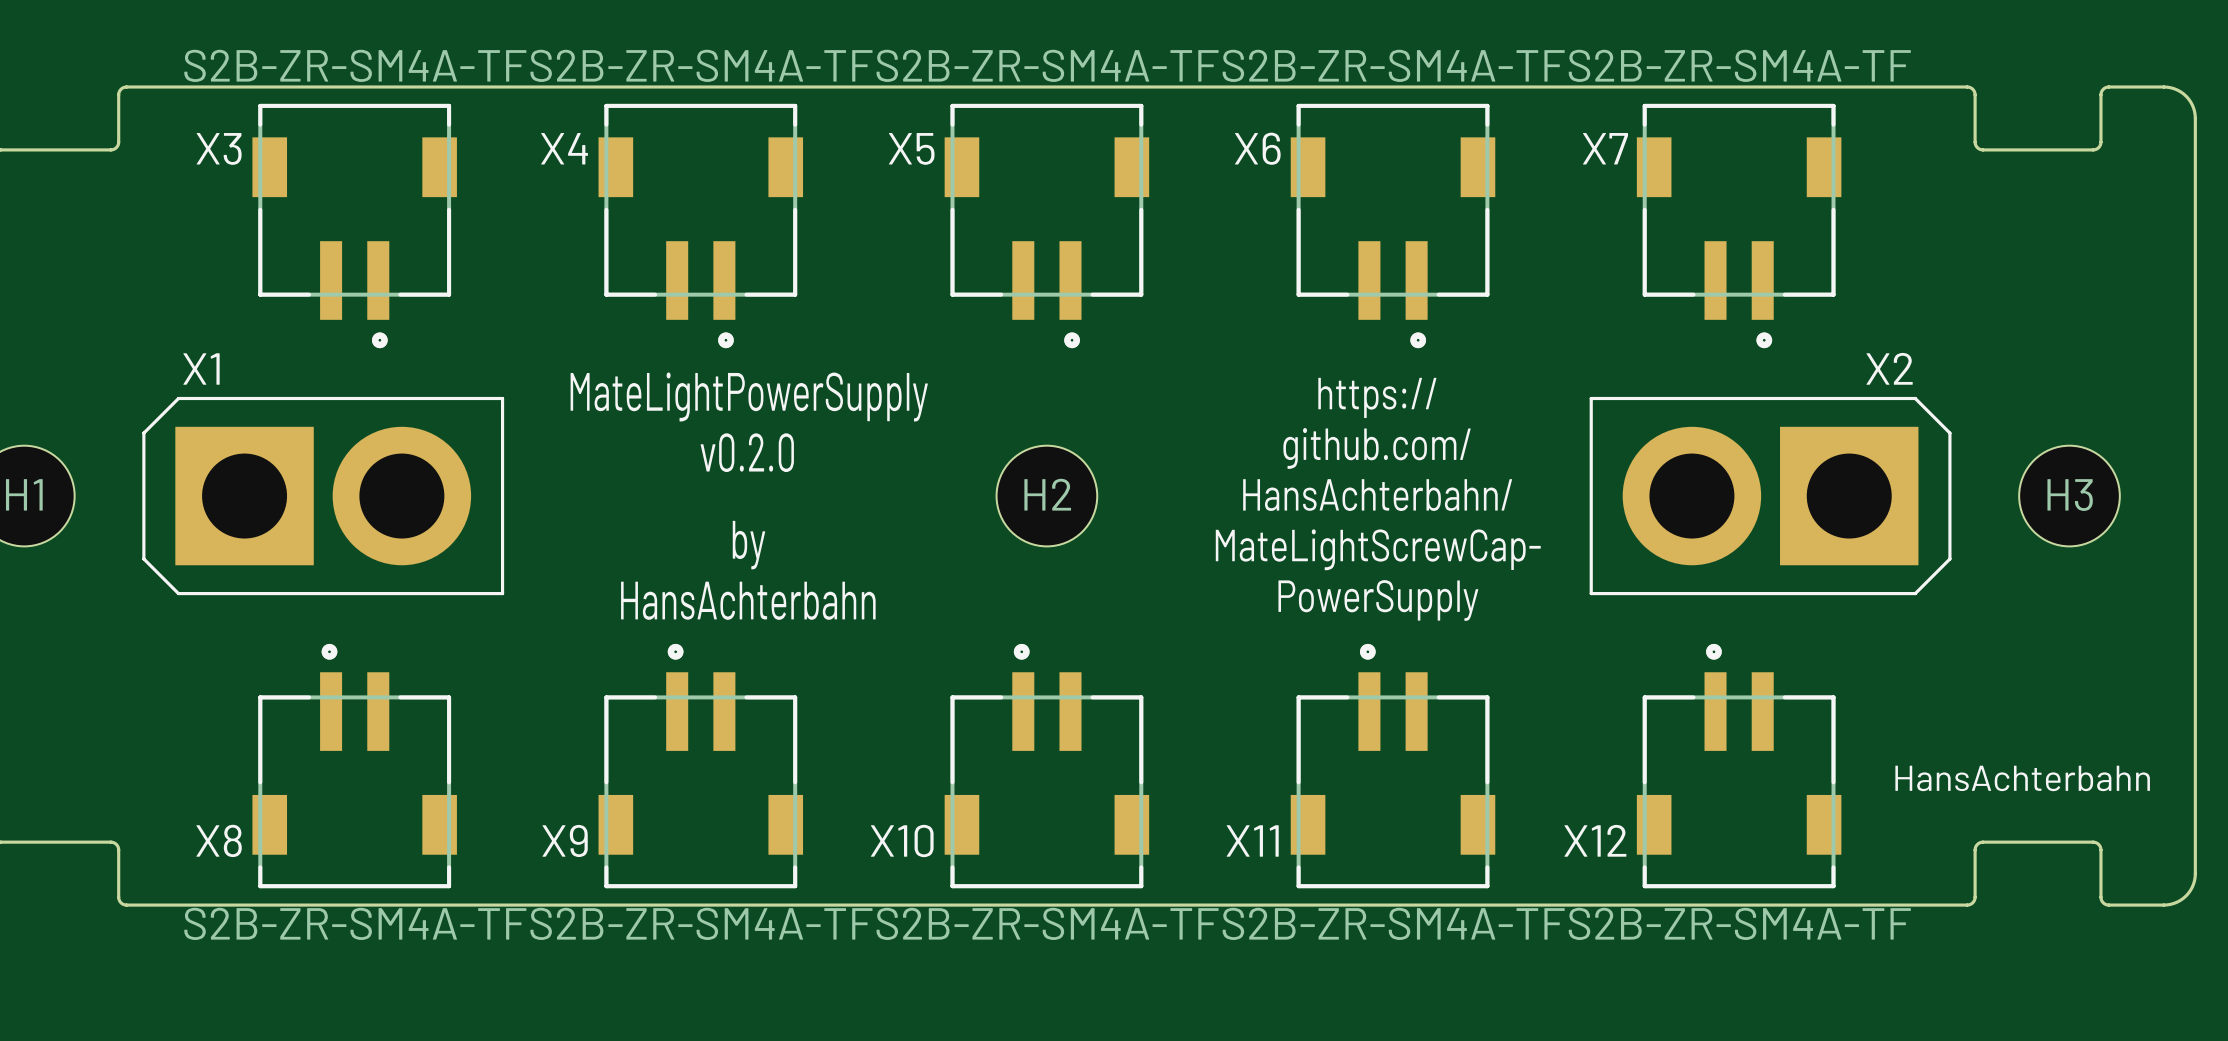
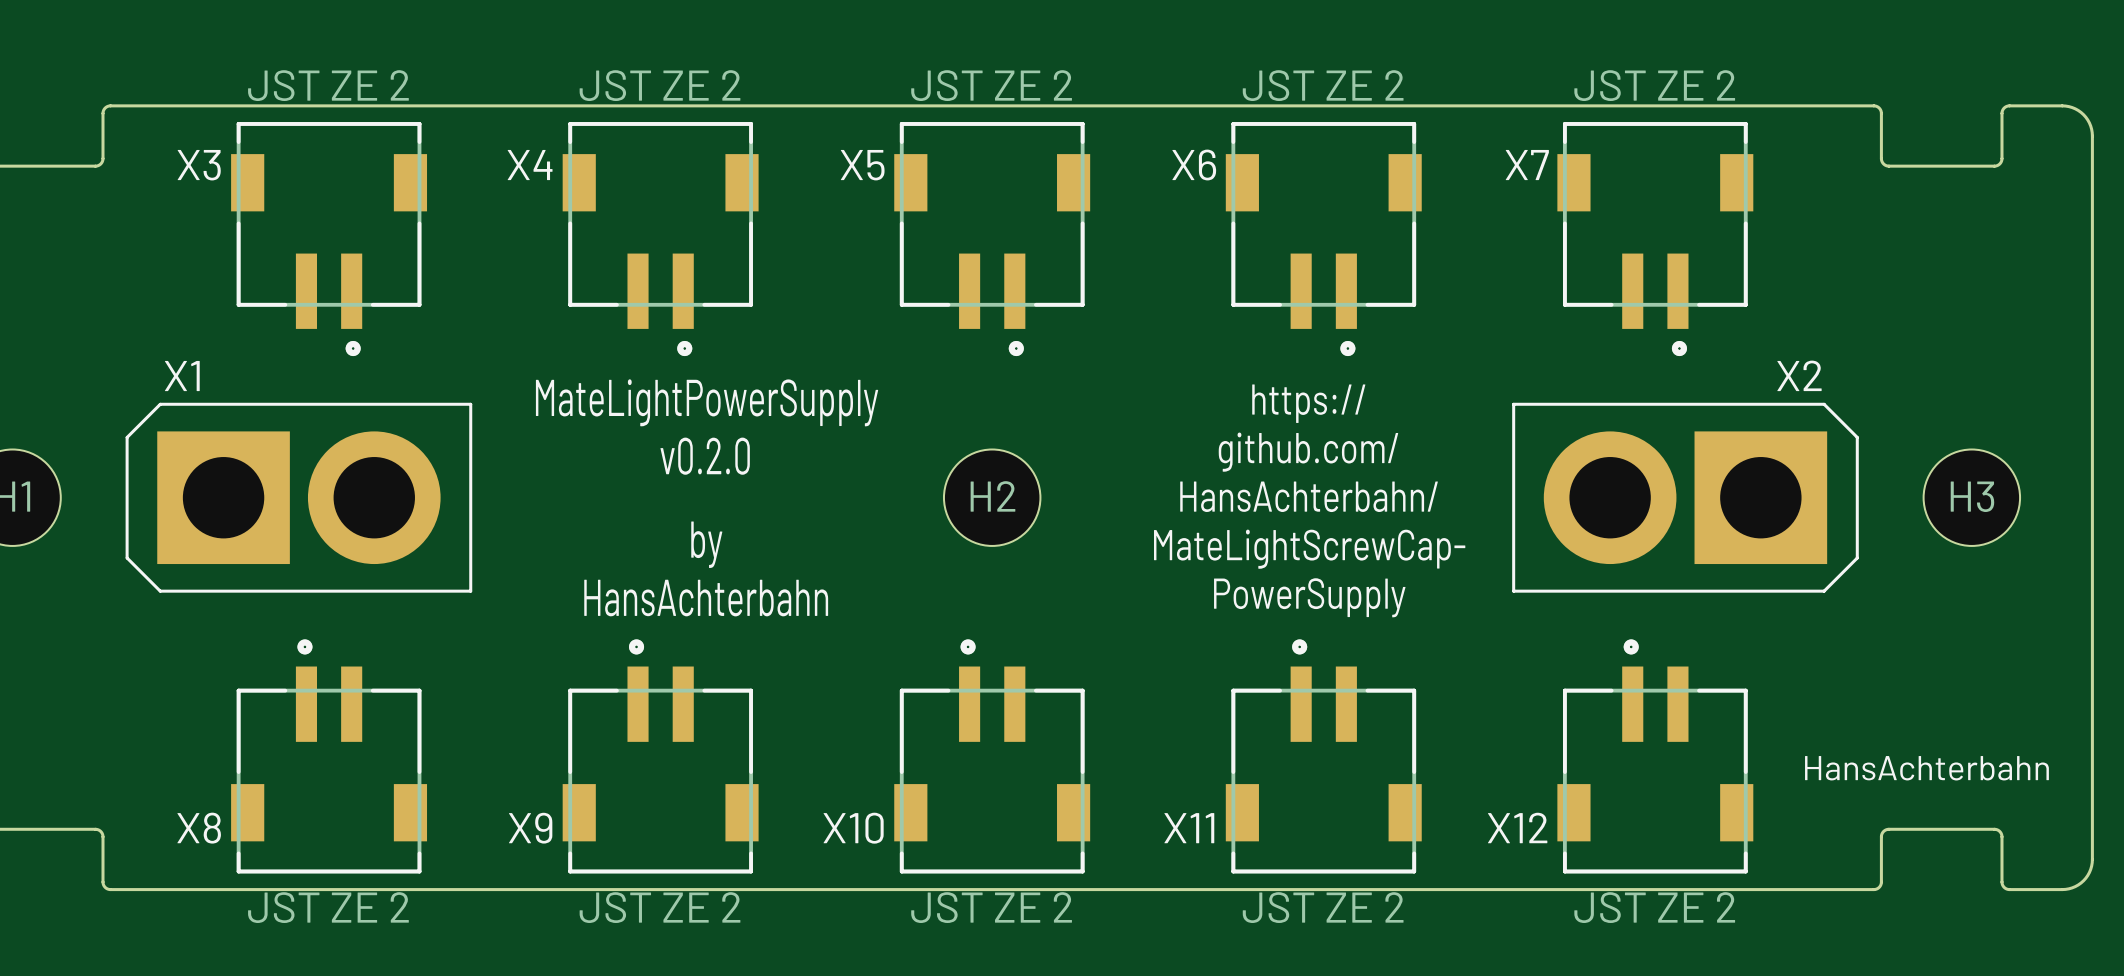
X3 value: S2B-ZR-SM4A-TF (355, 65) -> JST ZE 2 (328, 85)
X4 value: S2B-ZR-SM4A-TF (701, 65) -> JST ZE 2 (660, 85)
X5 value: S2B-ZR-SM4A-TF (1047, 65) -> JST ZE 2 (991, 85)
X6 value: S2B-ZR-SM4A-TF (1393, 65) -> JST ZE 2 (1323, 85)
X7 value: S2B-ZR-SM4A-TF (1739, 65) -> JST ZE 2 (1654, 85)
X8 value: S2B-ZR-SM4A-TF (355, 923) -> JST ZE 2 (328, 907)
X9 value: S2B-ZR-SM4A-TF (701, 923) -> JST ZE 2 (660, 907)
X10 value: S2B-ZR-SM4A-TF (1047, 923) -> JST ZE 2 (991, 907)
X11 value: S2B-ZR-SM4A-TF (1393, 923) -> JST ZE 2 (1323, 907)
X12 value: S2B-ZR-SM4A-TF (1739, 923) -> JST ZE 2 (1654, 907)

